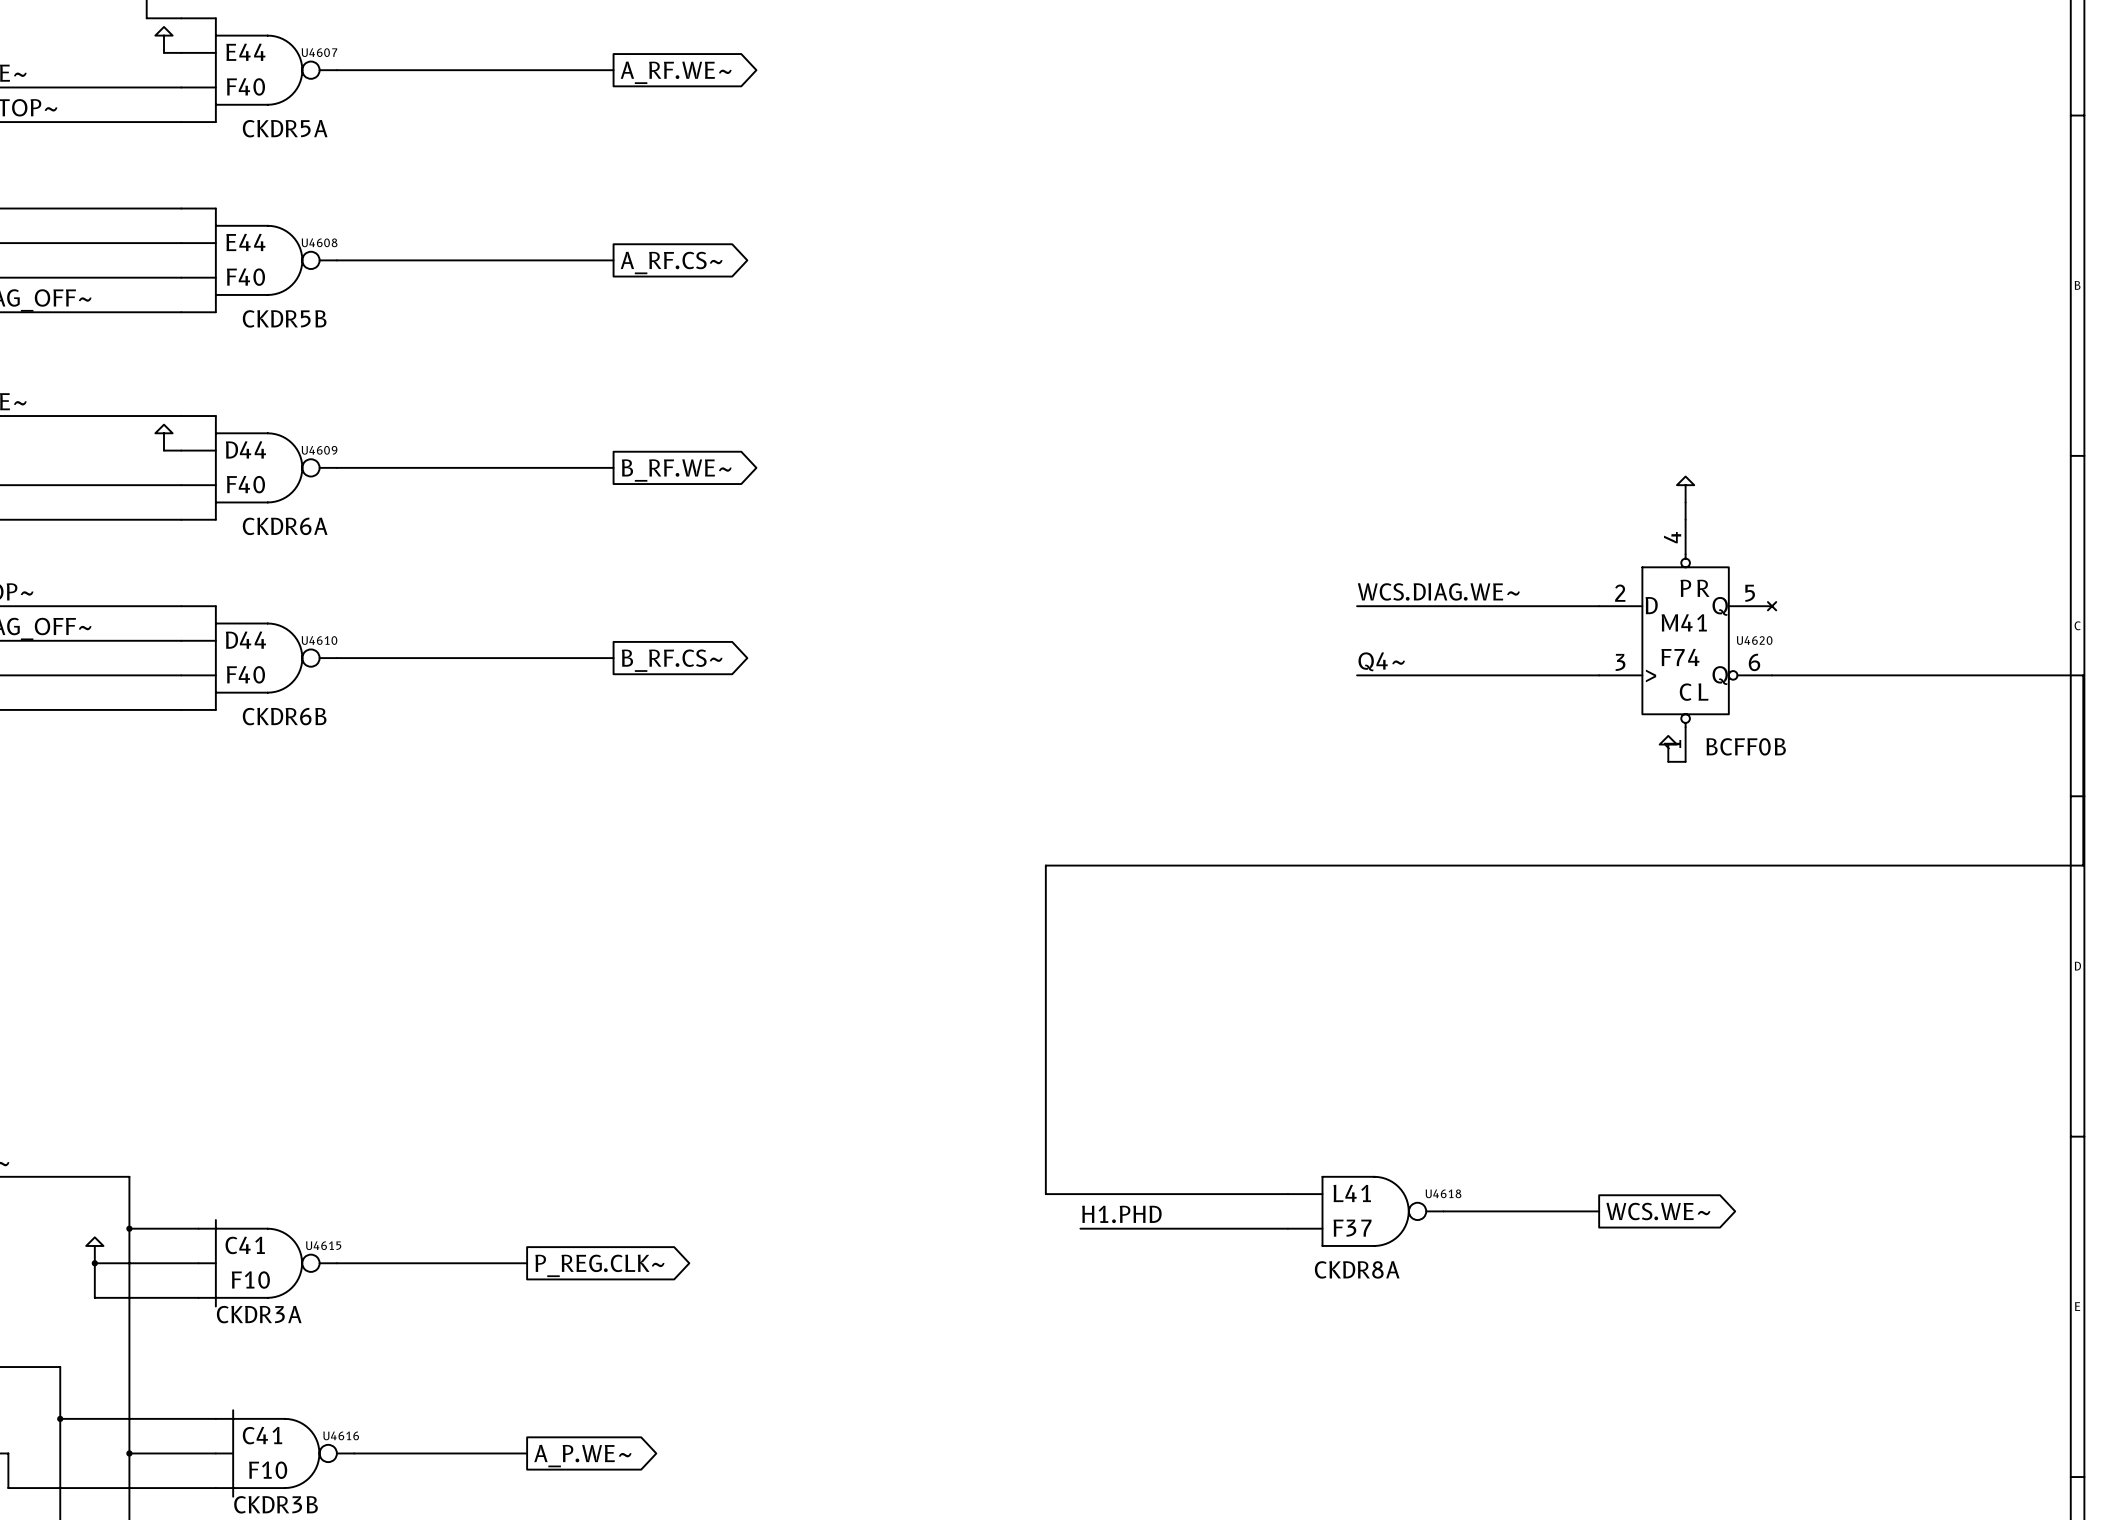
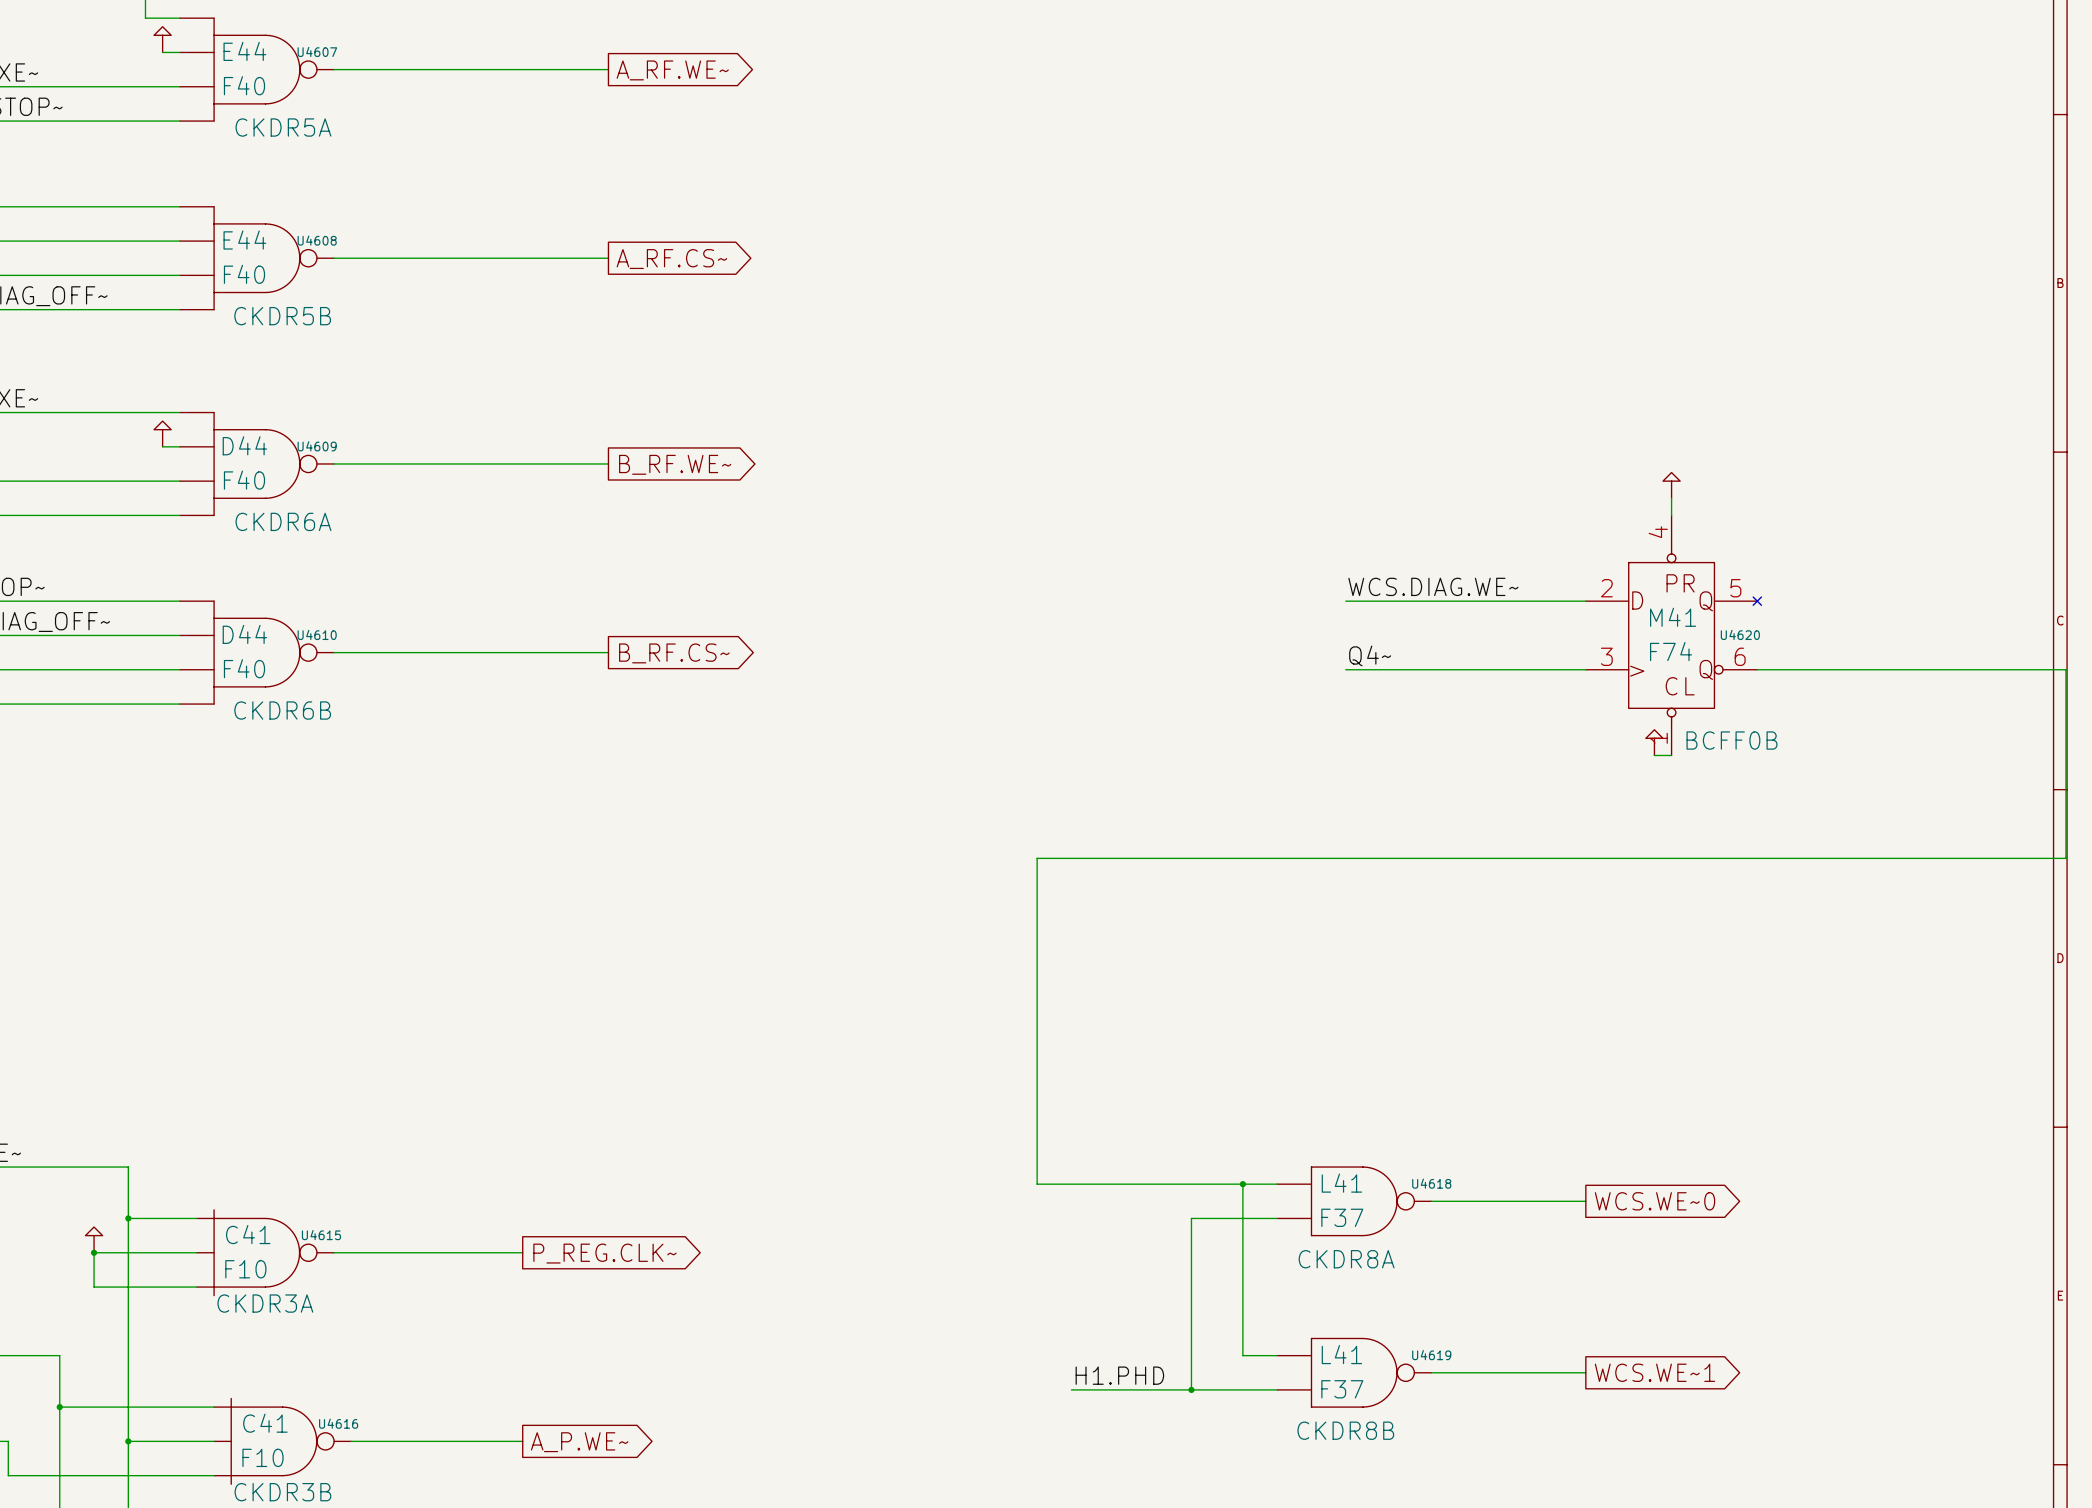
wire: none -> (1242, 1184) (1242, 1355) (1277, 1355)
junction: none -> (1242, 1184)
global label: WCS.WE~ (1658, 1211) -> WCS.WE~0 (1655, 1201)
label: H1.PHD (1121, 1214) -> none
wire: (1080, 1228) (1201, 1228) -> (1191, 1389) (1191, 1218)
U4619: none -> F37 (1354, 1372)
wire: none -> (1431, 1372) (1585, 1372)
global label: none -> WCS.WE~1 (1655, 1372)
label: none -> H1.PHD (1119, 1375)
wire: none -> (1071, 1389) (1277, 1389)
junction: none -> (1191, 1389)

